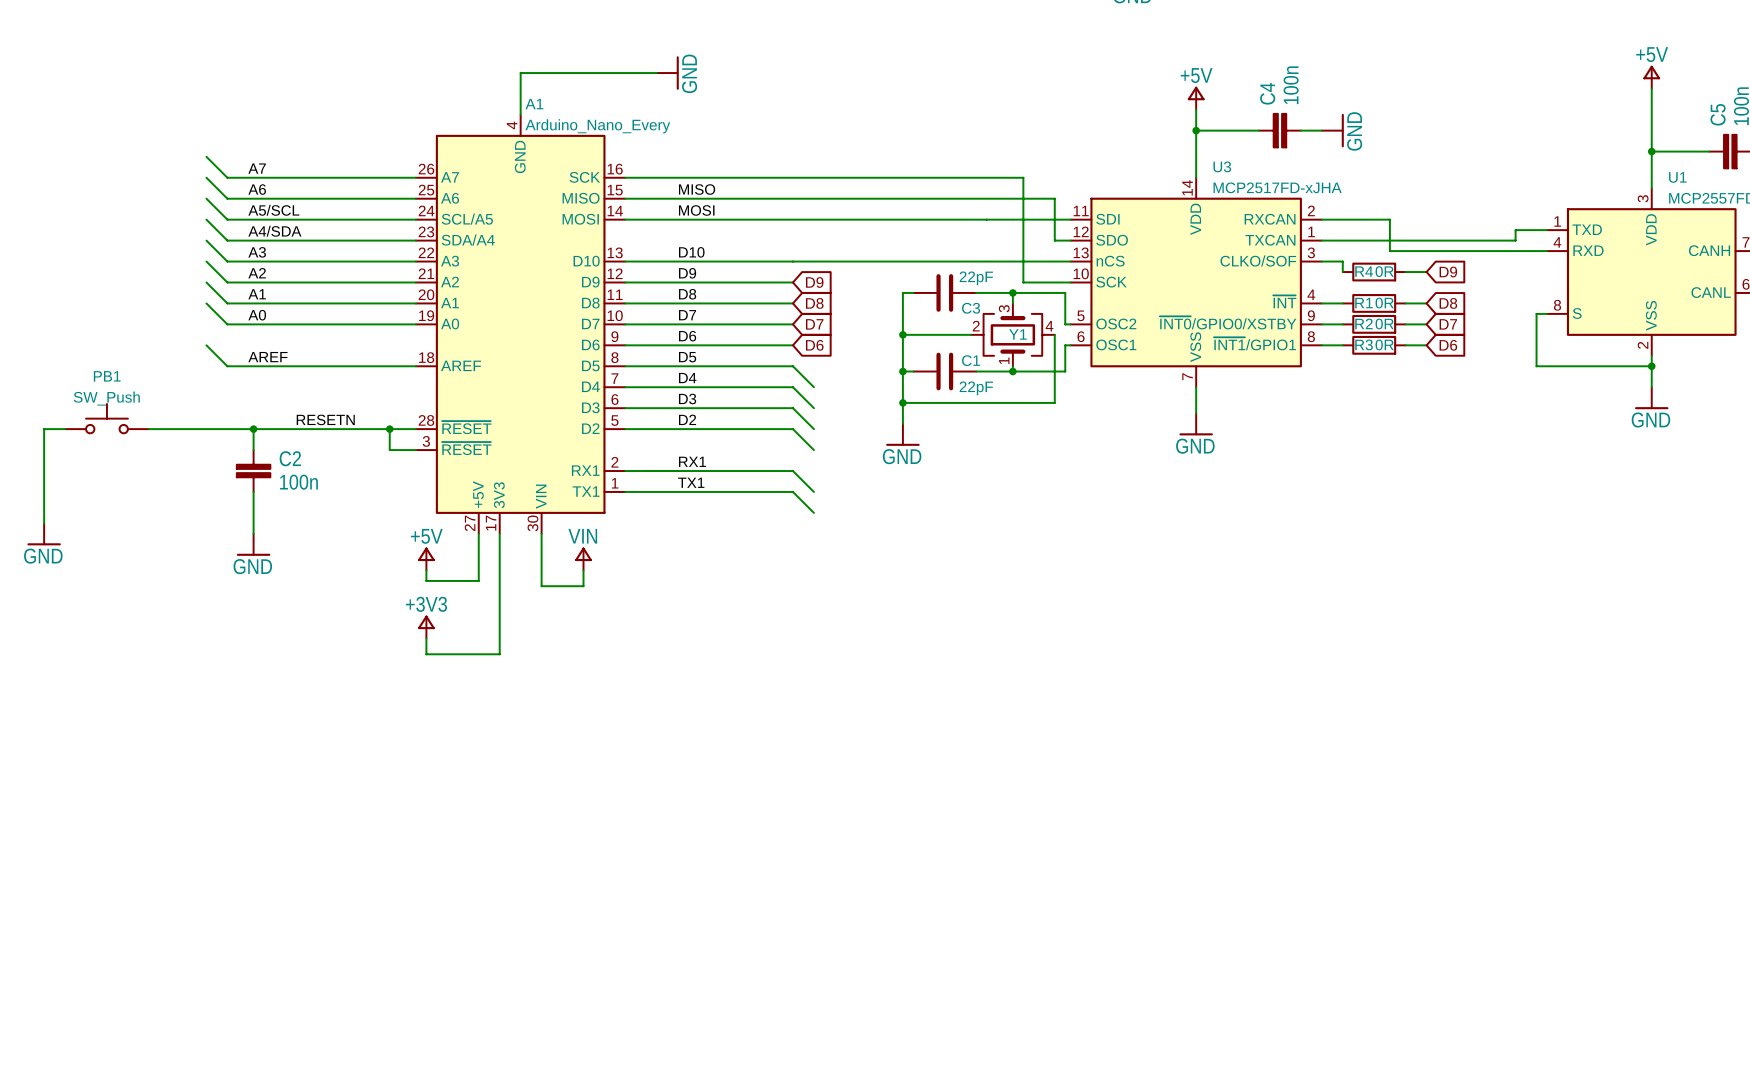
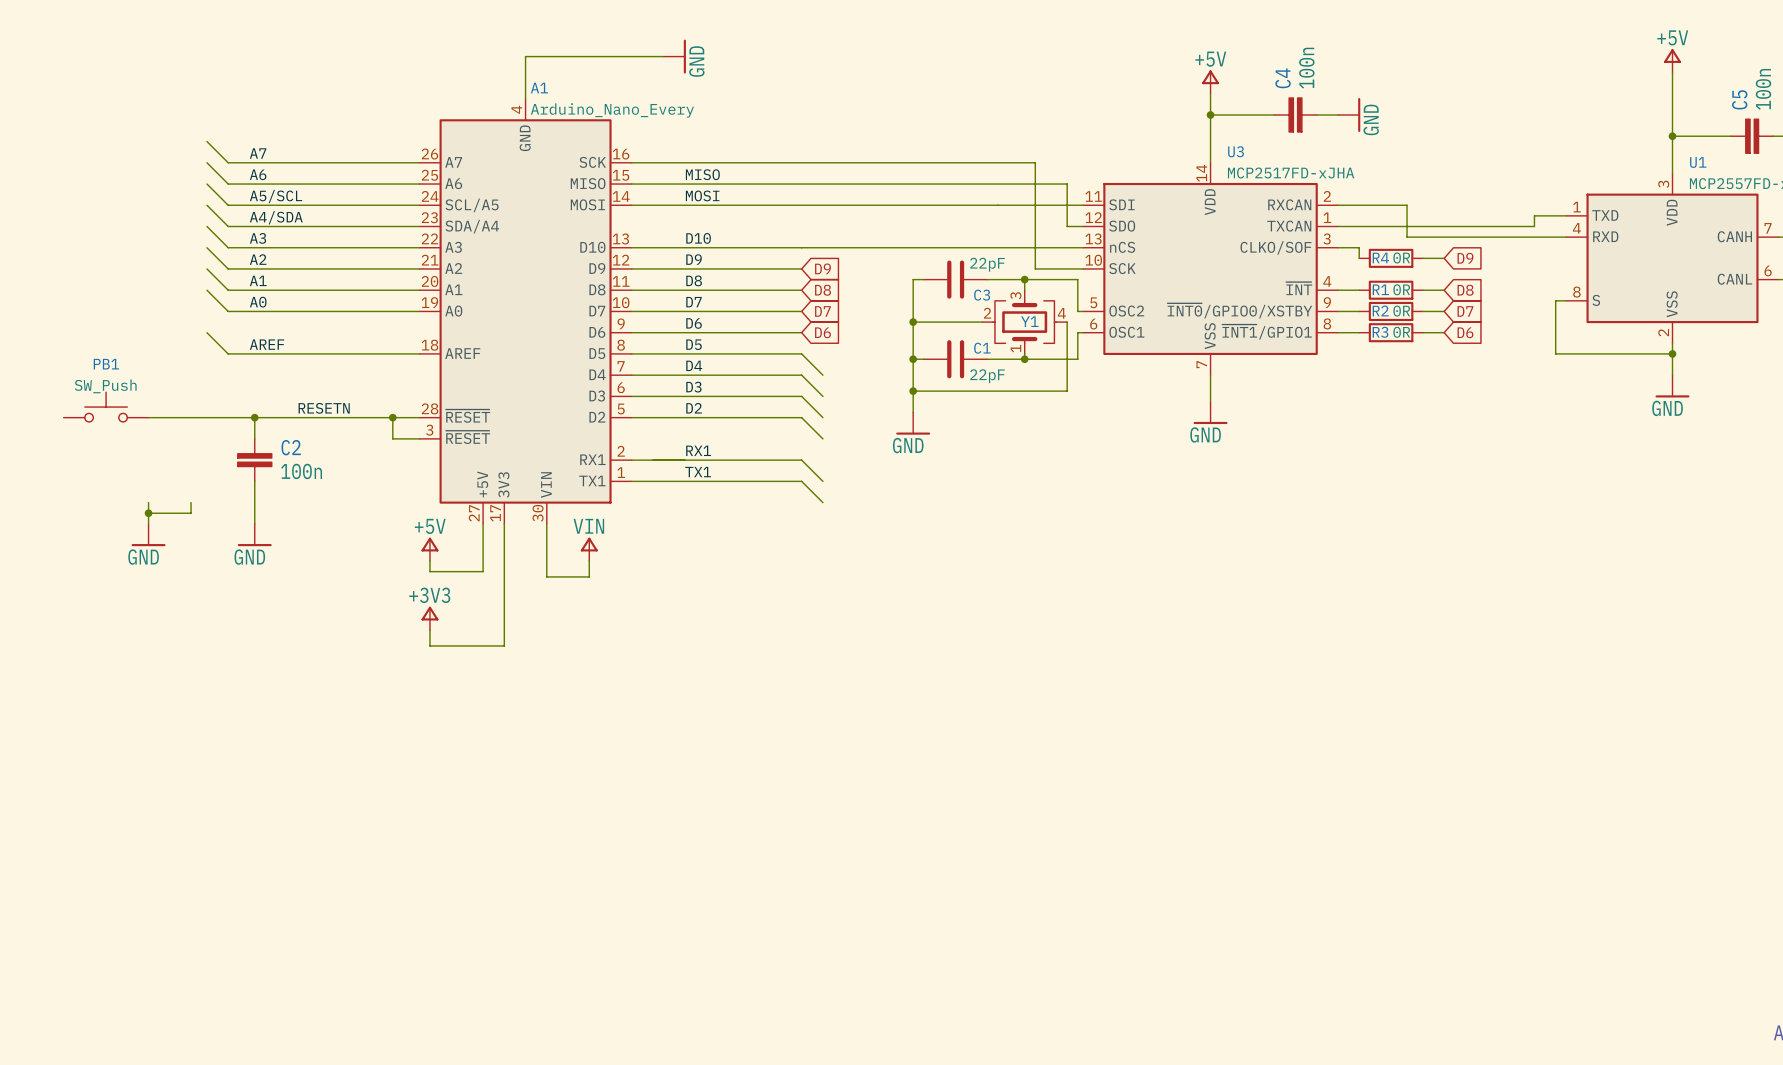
wire: (65, 429) (44, 429) (44, 523) -> none
wire: none -> (148, 502) (148, 523)
wire: none -> (191, 502) (191, 513) (148, 513)
junction: none -> (148, 513)
power symbol position: GND (44, 534) -> GND (148, 535)

